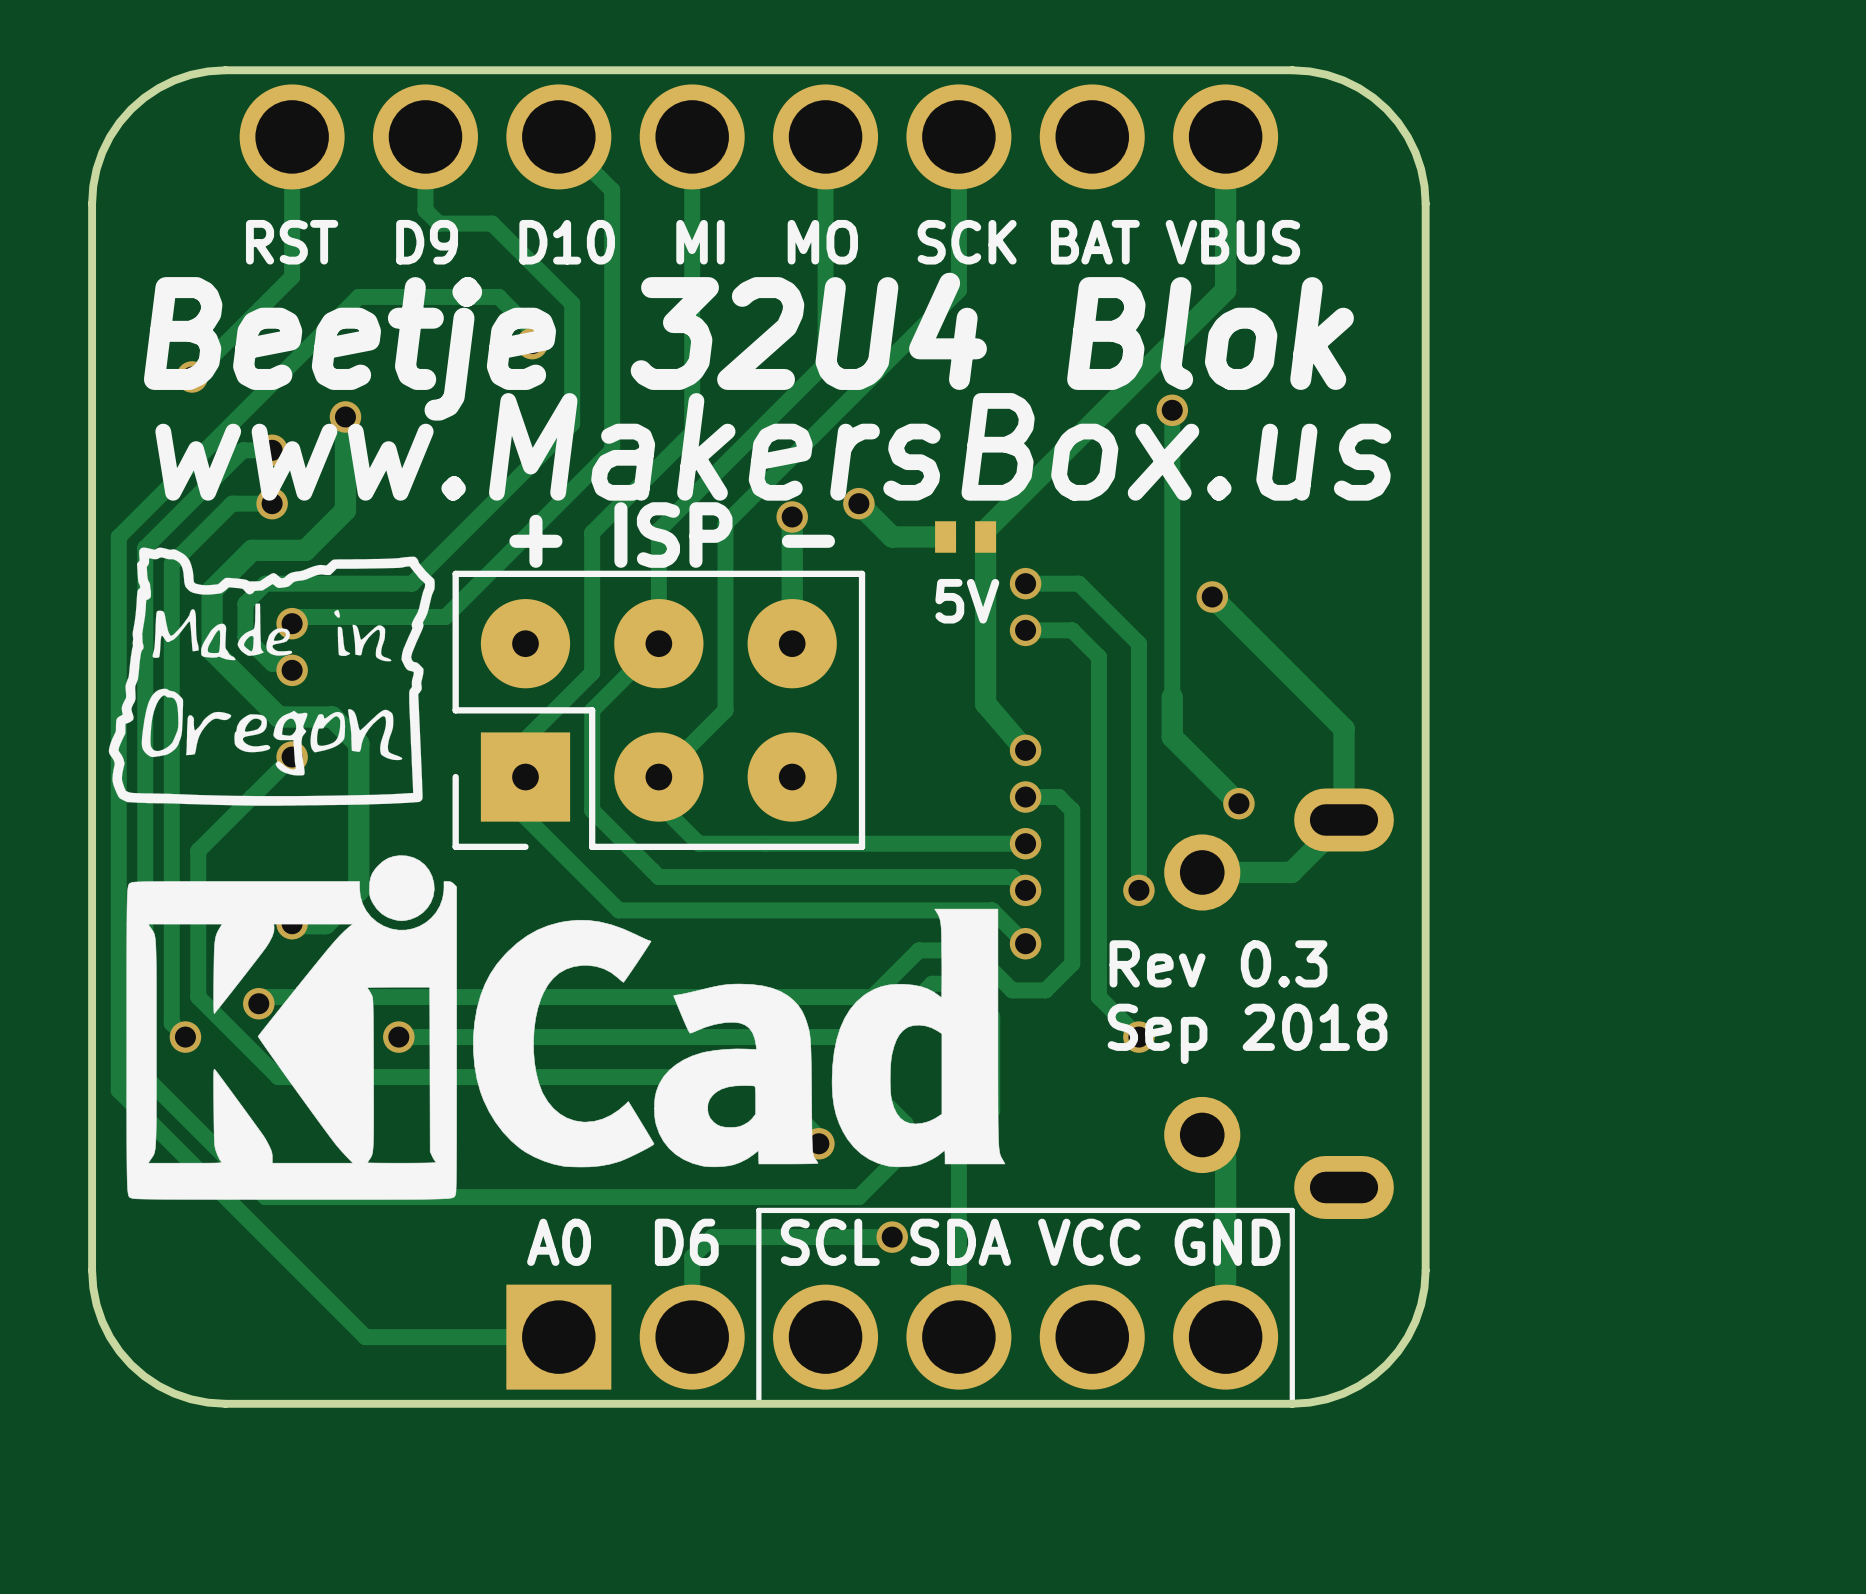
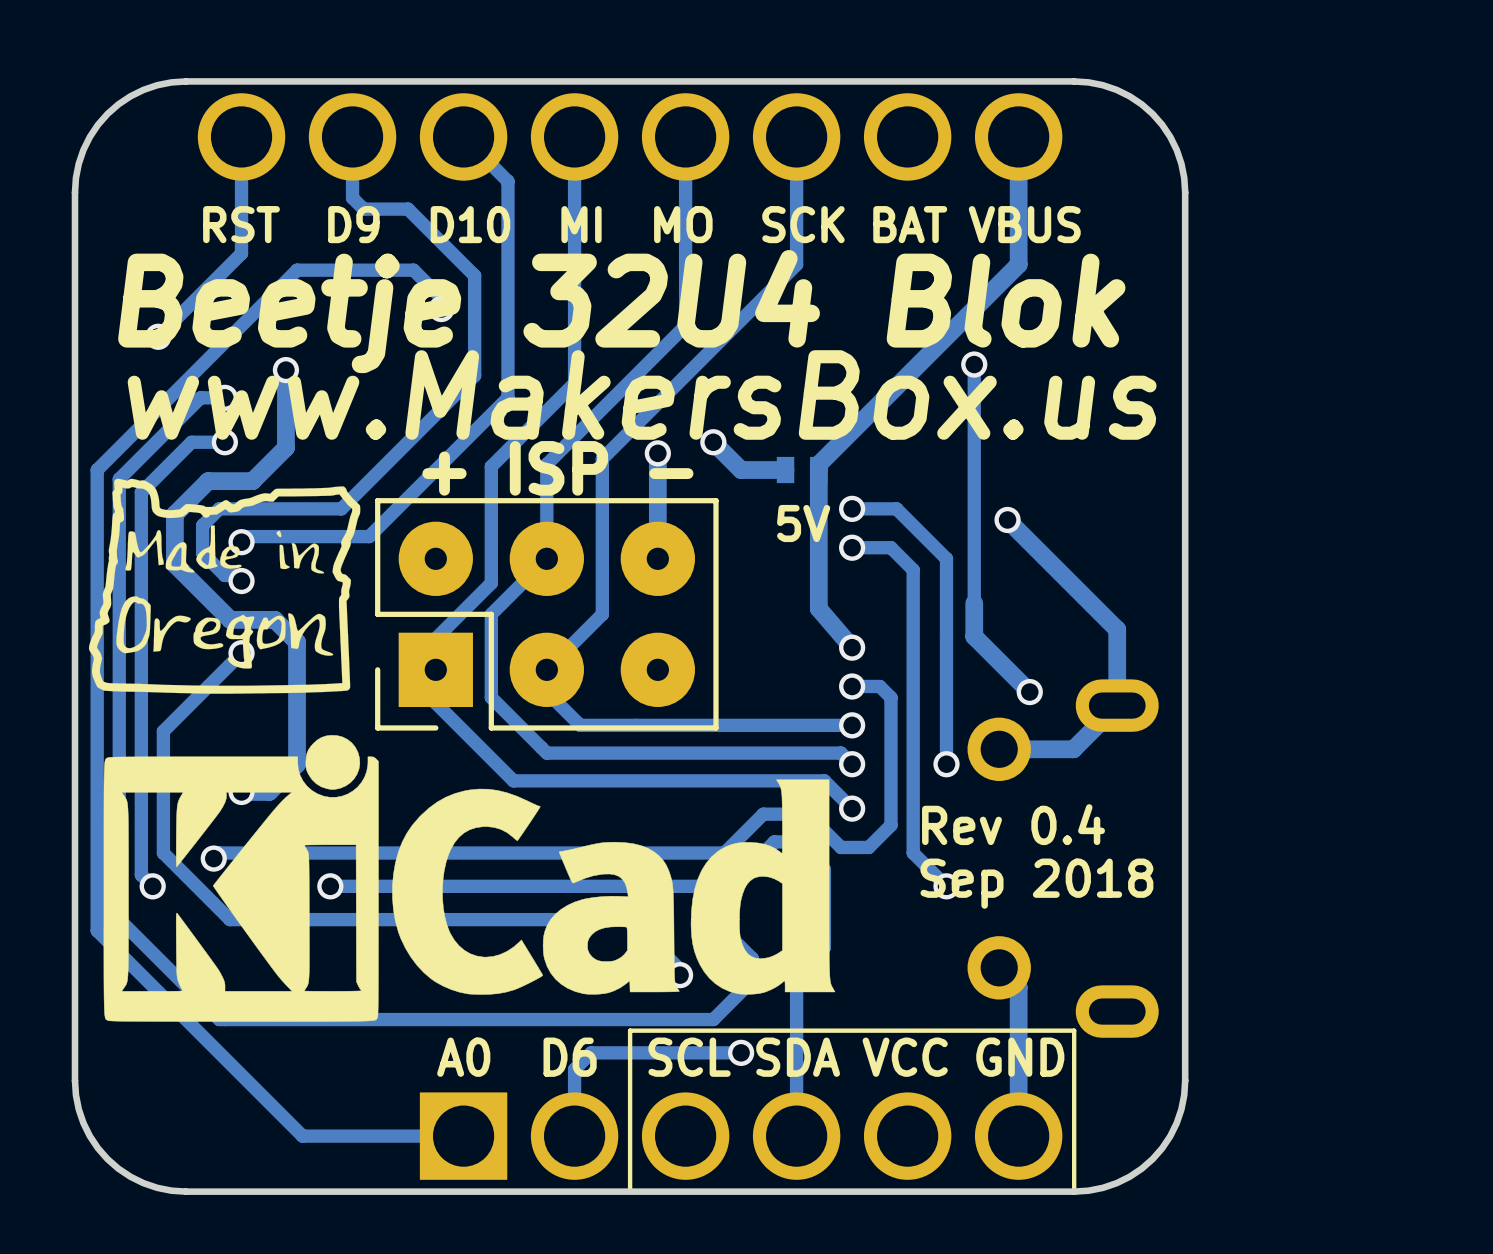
text: Rev 0.3 (1218, 963) -> Rev 0.4 (1013, 824)

